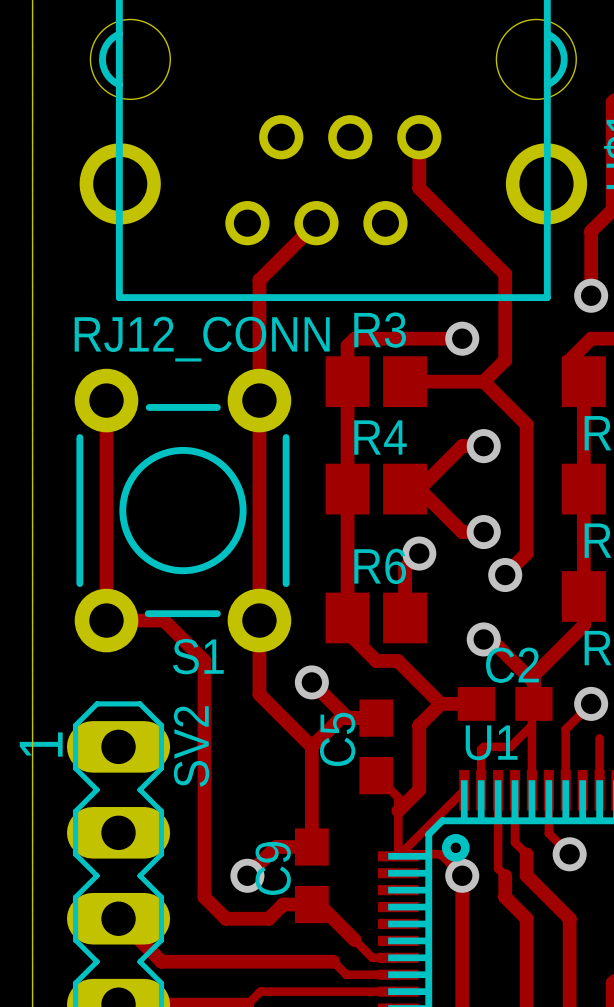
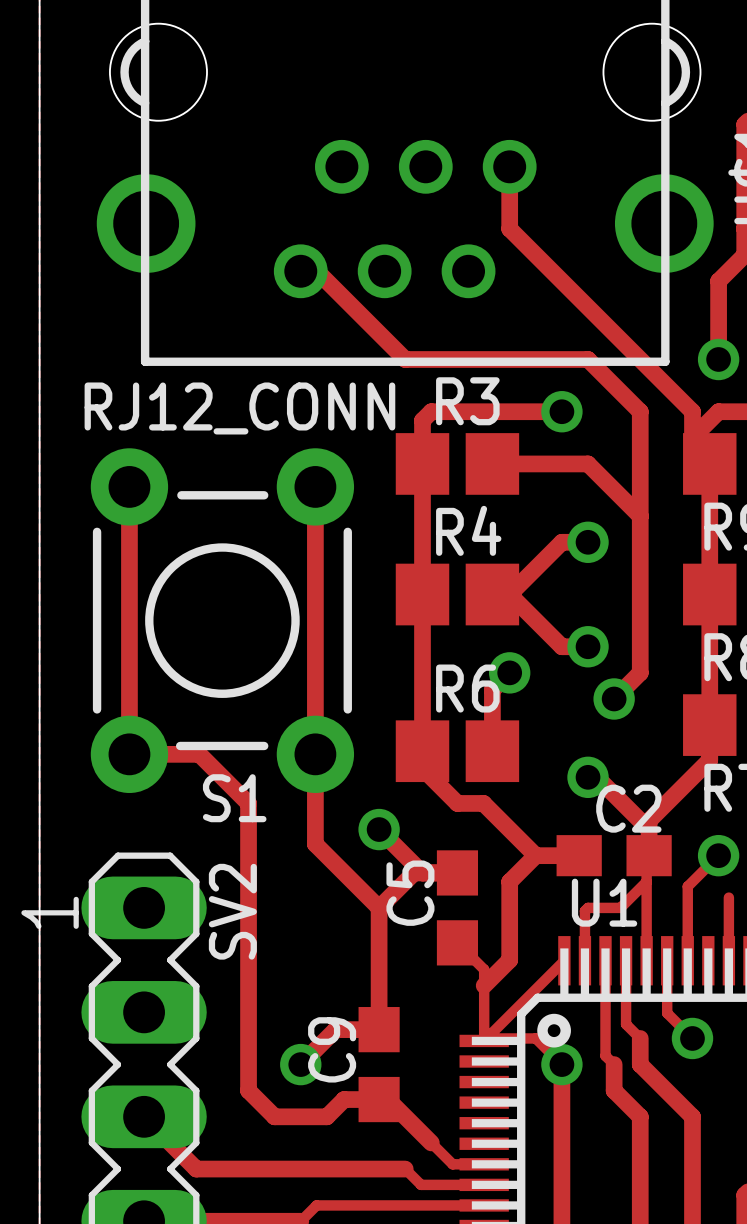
track: none -> (300, 271) (317, 271) (405, 359) (588, 359) (640, 411) (640, 516)
track: (316, 223) (259, 280) (259, 400) -> none
track: (505, 274) (505, 360) (483, 381) -> (614, 333) (692, 411) (692, 437)

